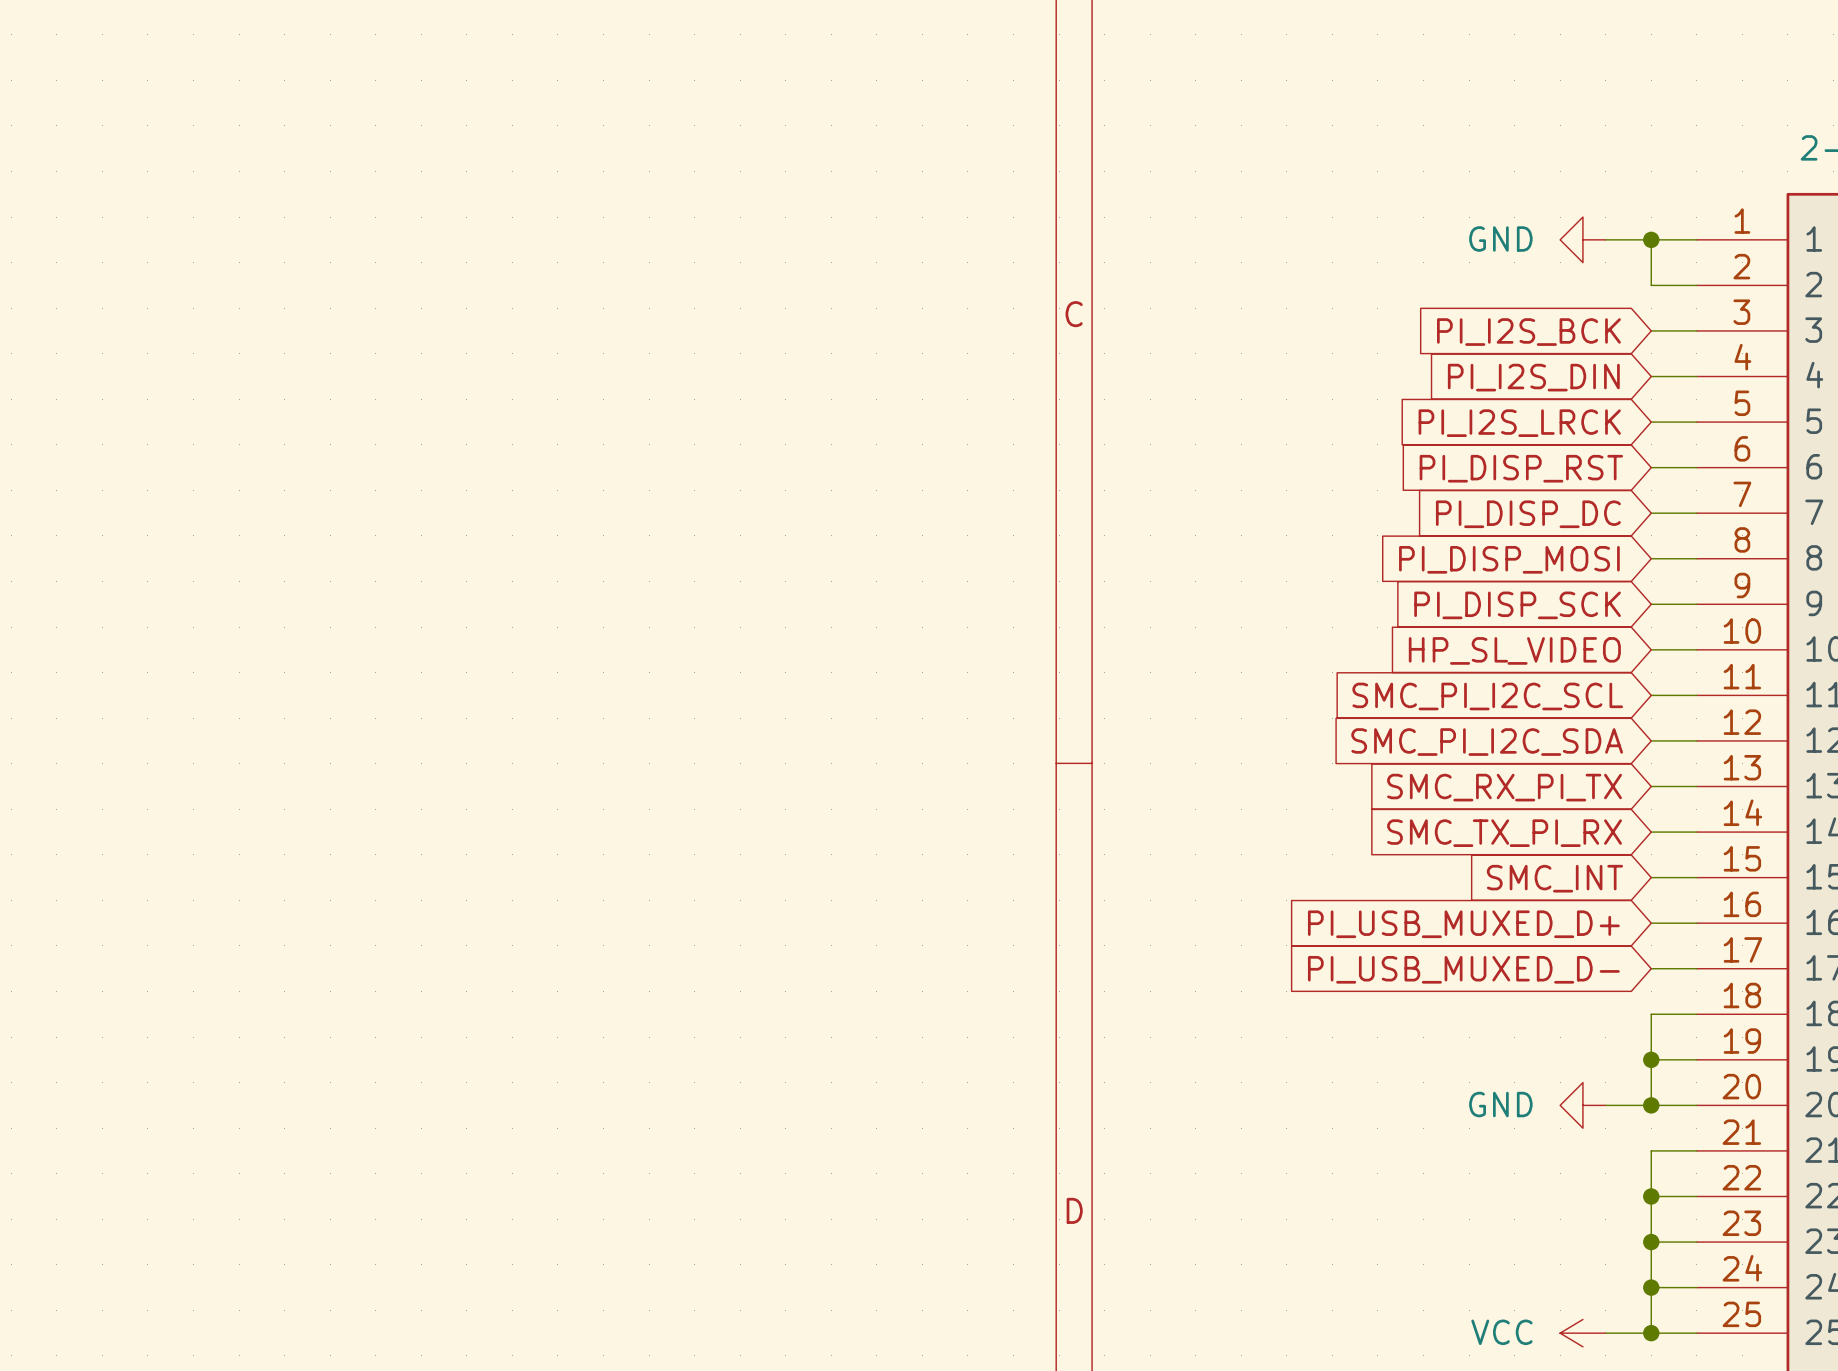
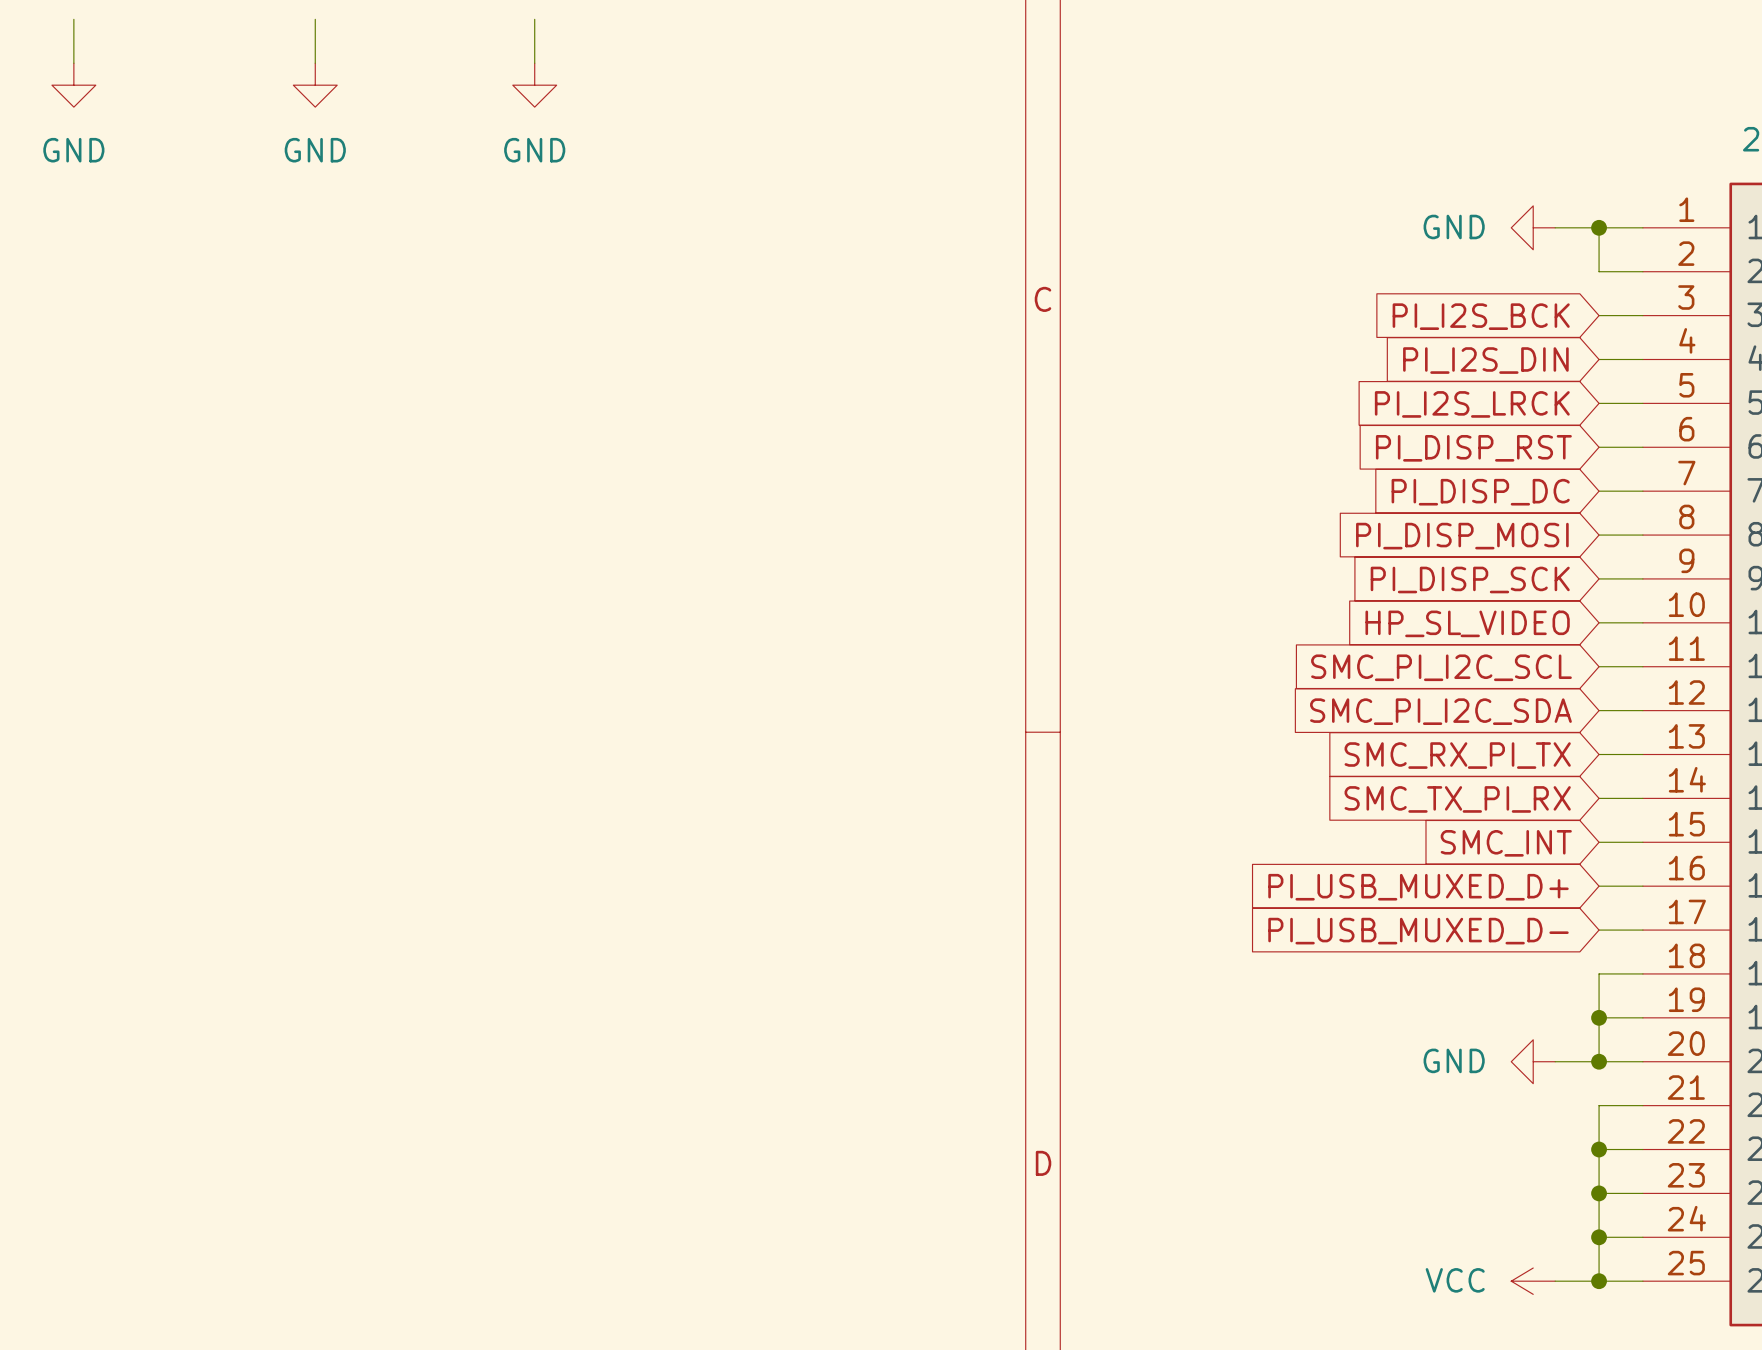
wire: none -> (73, 19) (73, 63)
wire: none -> (315, 19) (315, 63)
wire: none -> (534, 19) (534, 63)
power symbol: none -> GND (73, 85)
power symbol: none -> GND (315, 85)
power symbol: none -> GND (534, 85)

